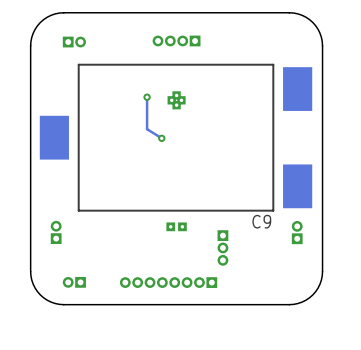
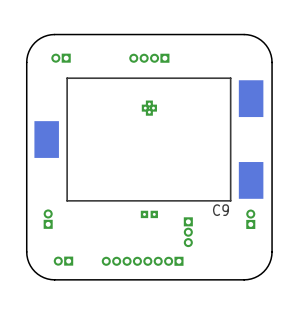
part rotation: 0° (74, 42) -> 180° (61, 58)
track: (147, 97) (147, 129) (161, 138) -> none
via: (147, 97) -> none
via: (161, 138) -> none

